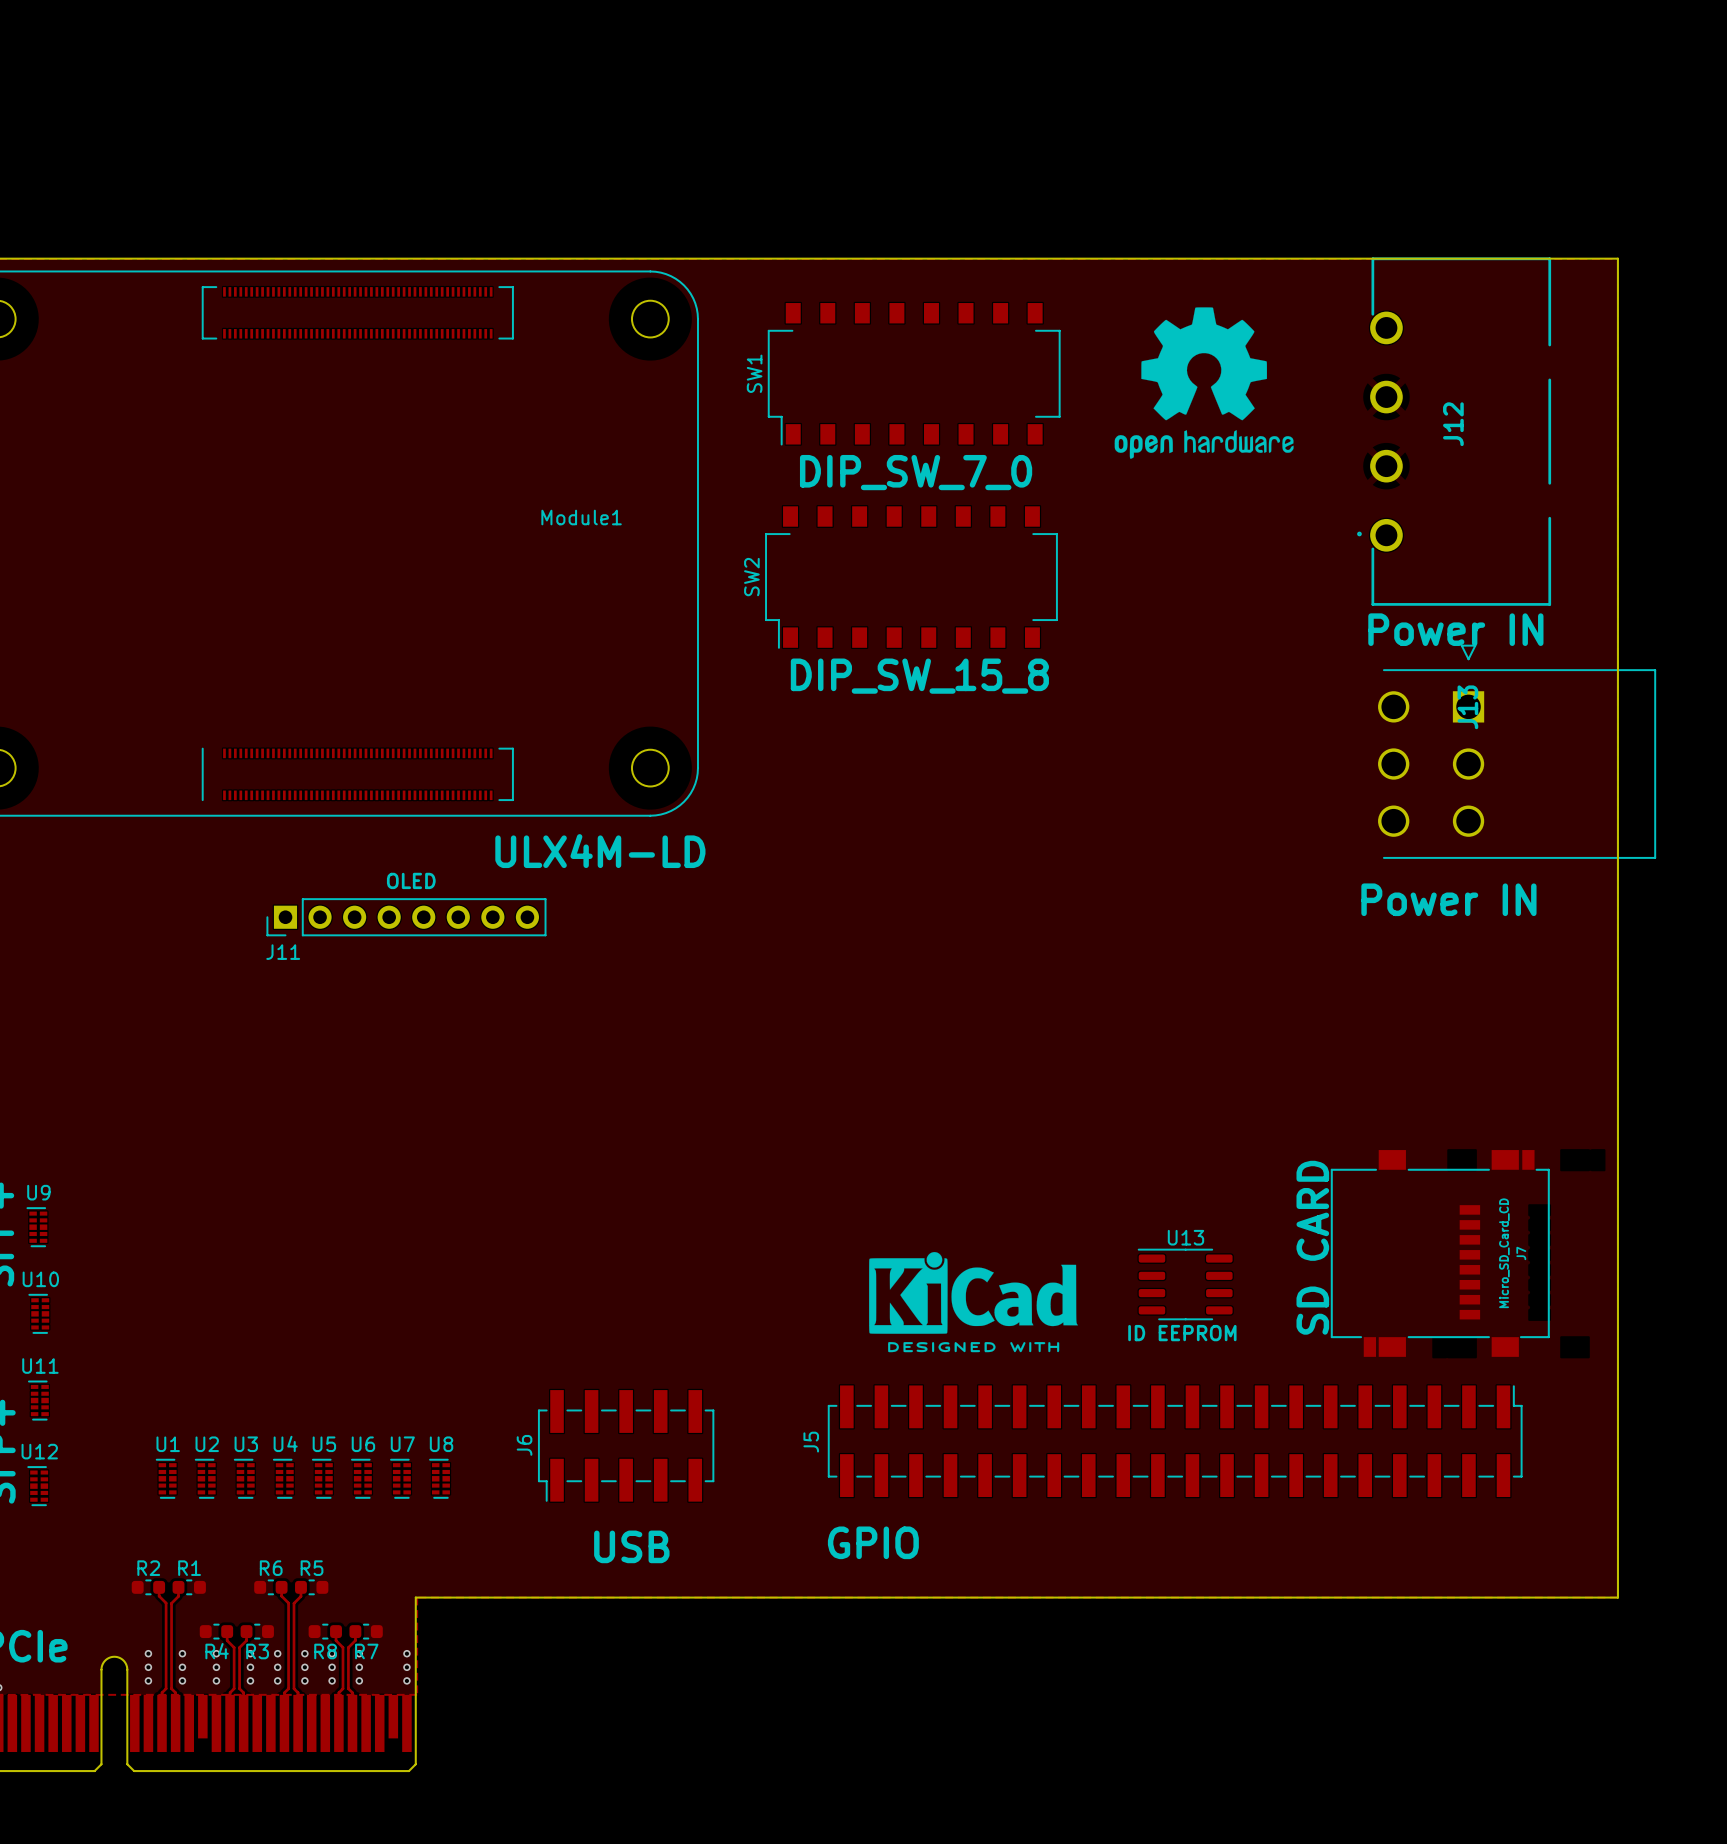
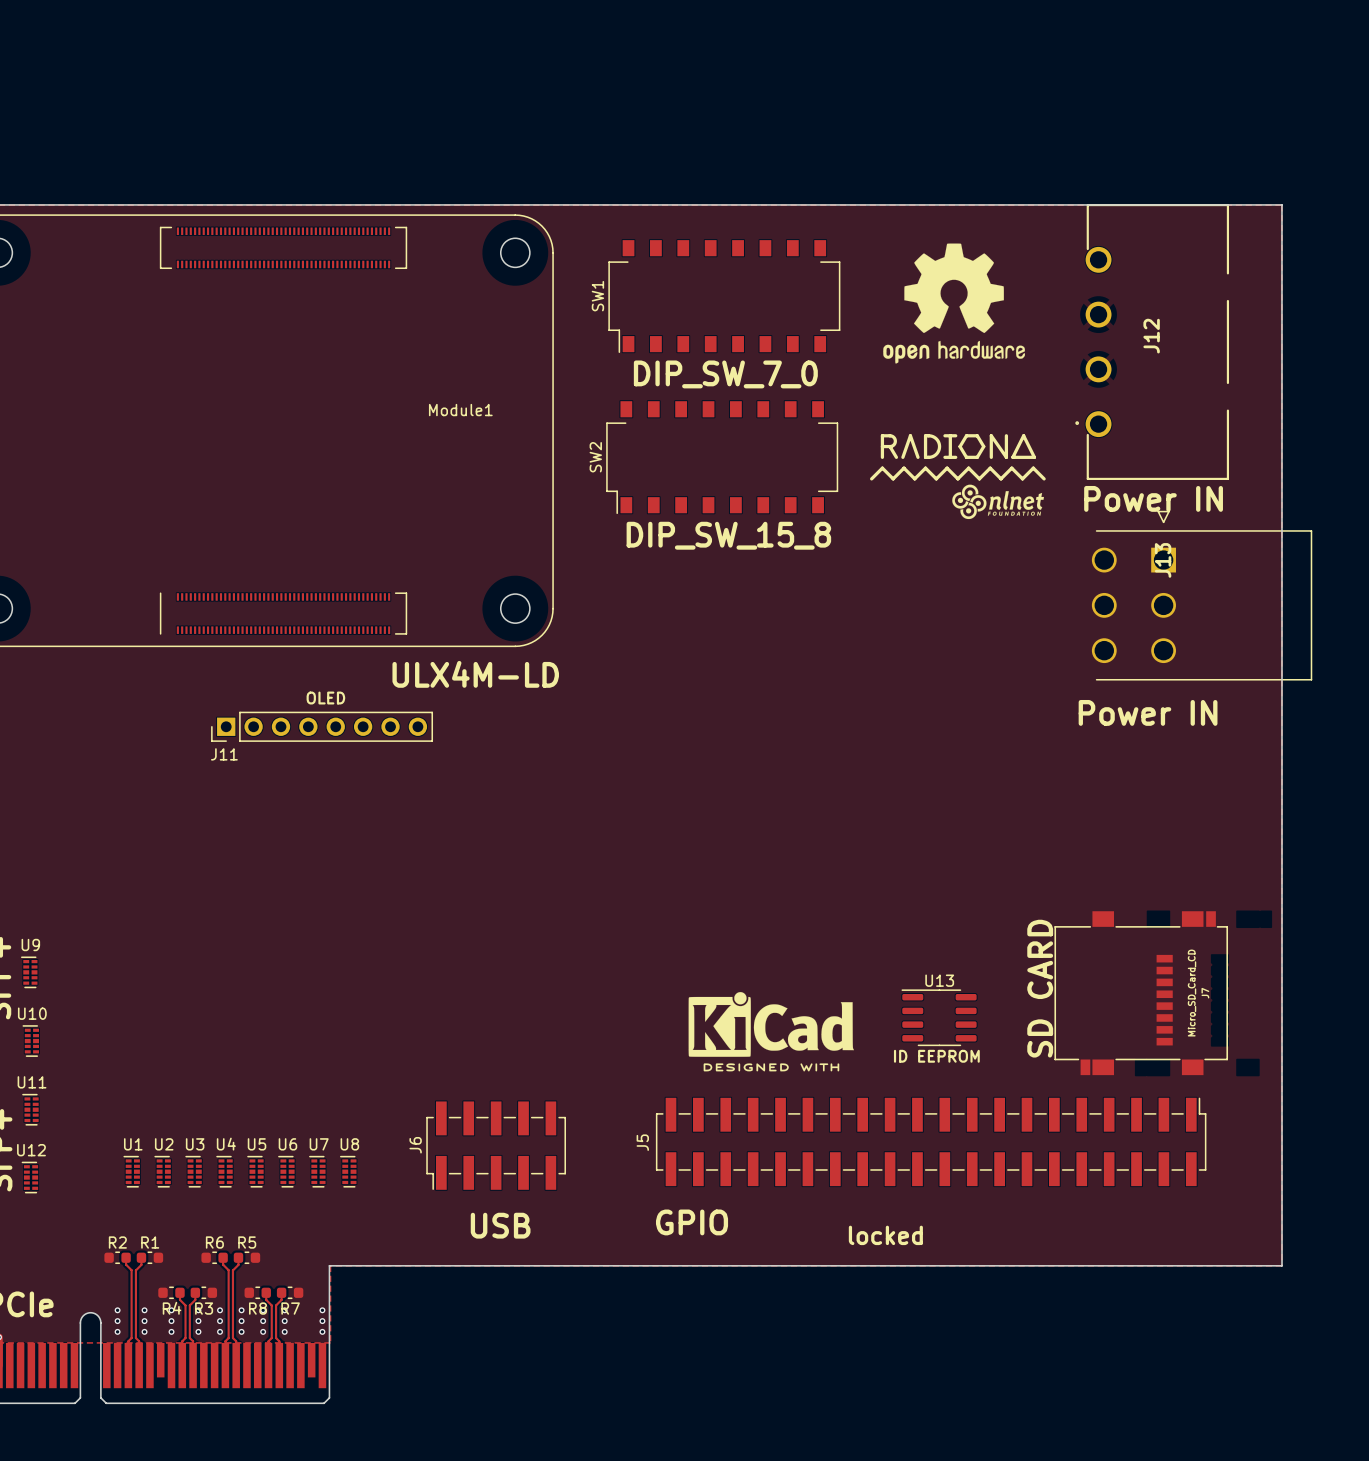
drawing: none -> [870, 434, 1046, 520]
text: none -> locked (885, 1235)

